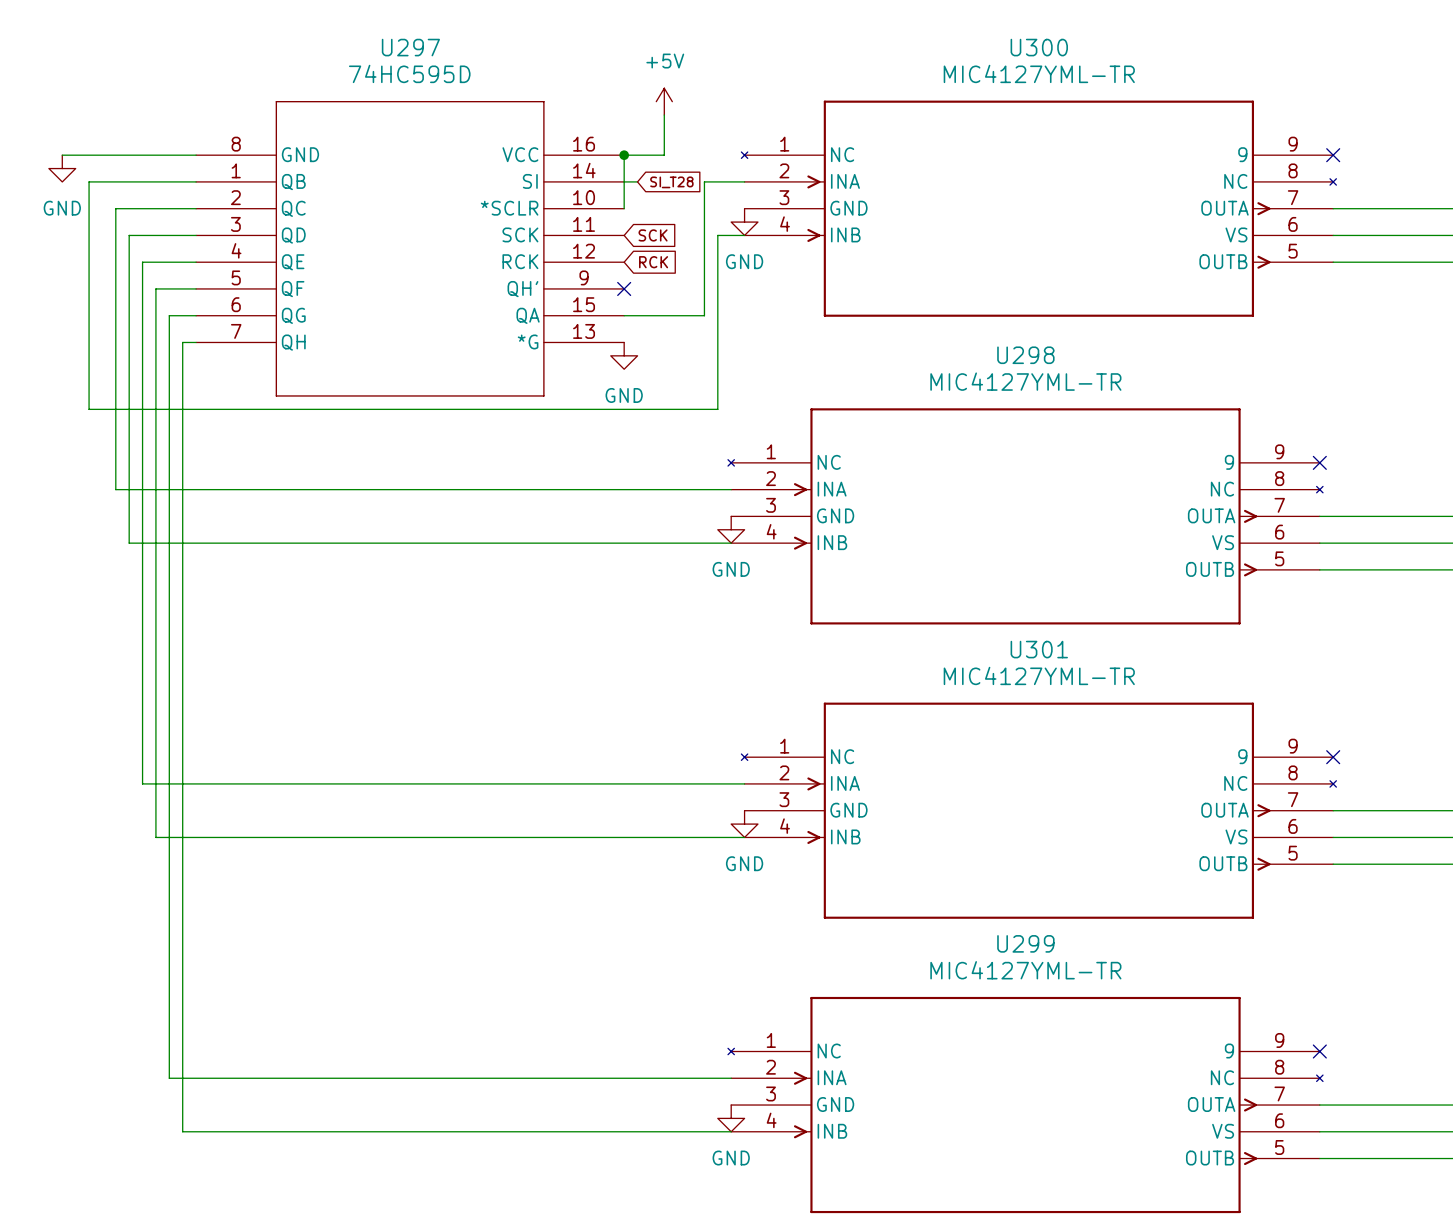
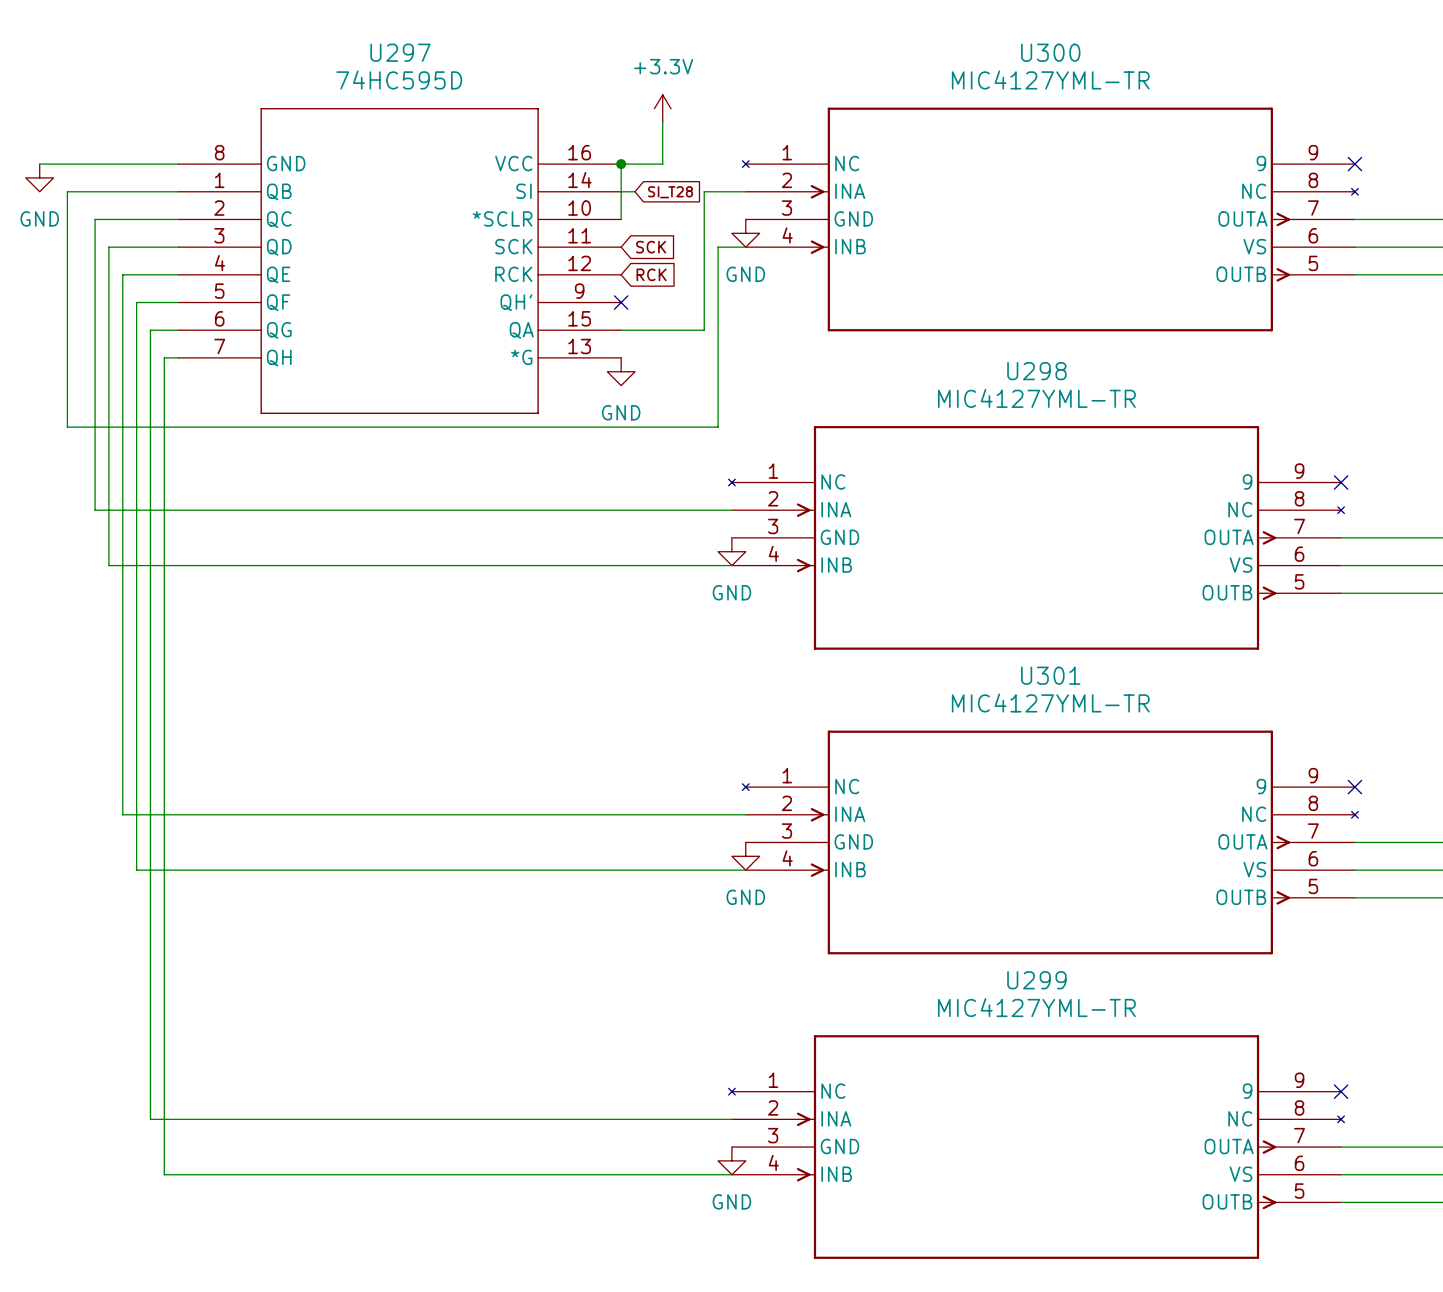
power symbol: +5V (664, 101) -> +3.3V (662, 108)

